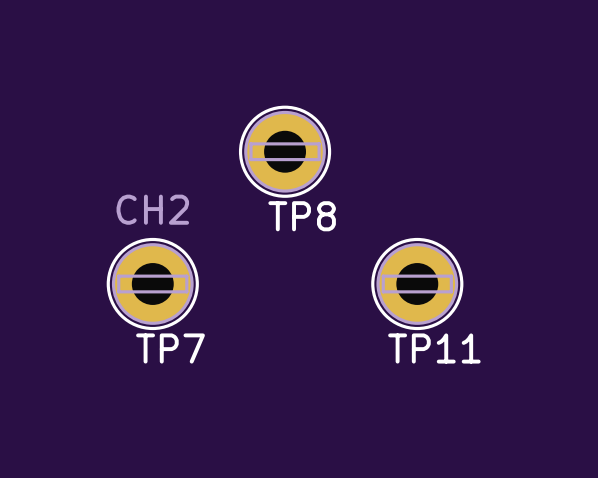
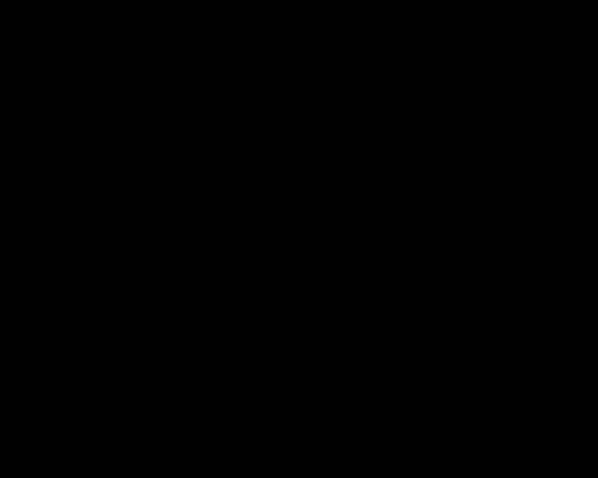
TP8: (285, 151) -> none
TP7: CH2 (152, 284) -> none
TP11: (417, 284) -> none

